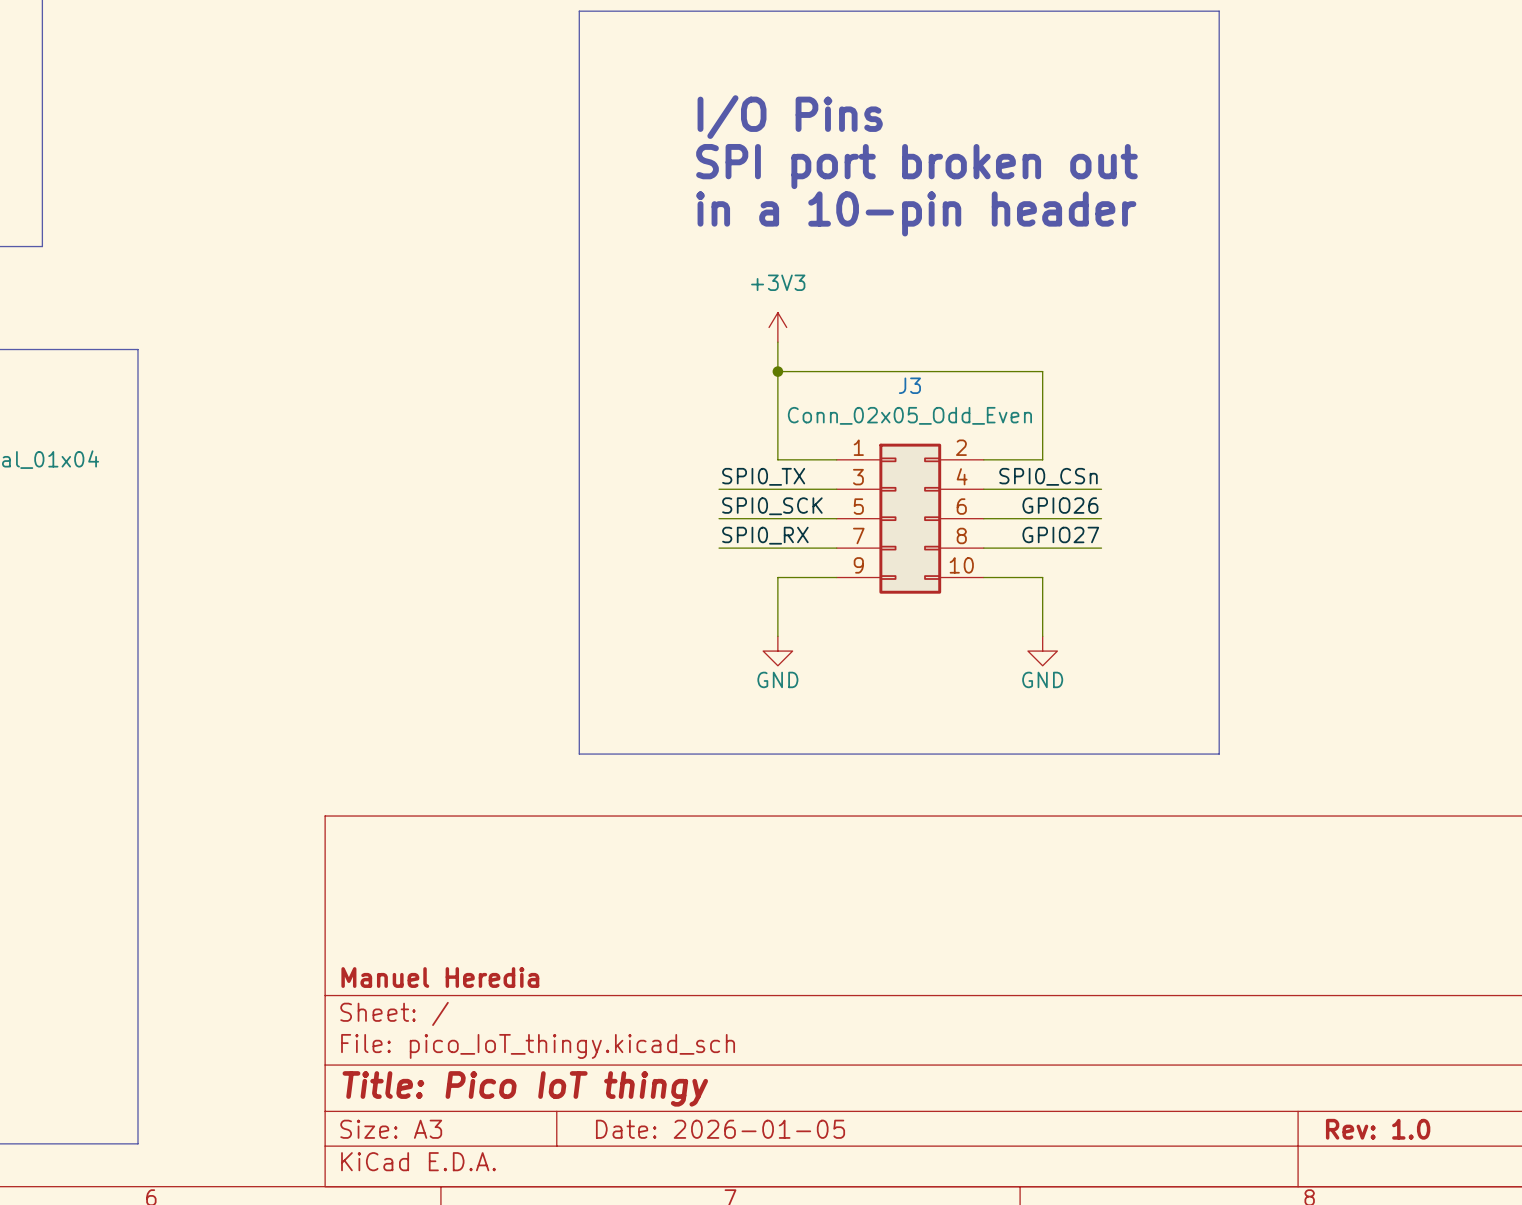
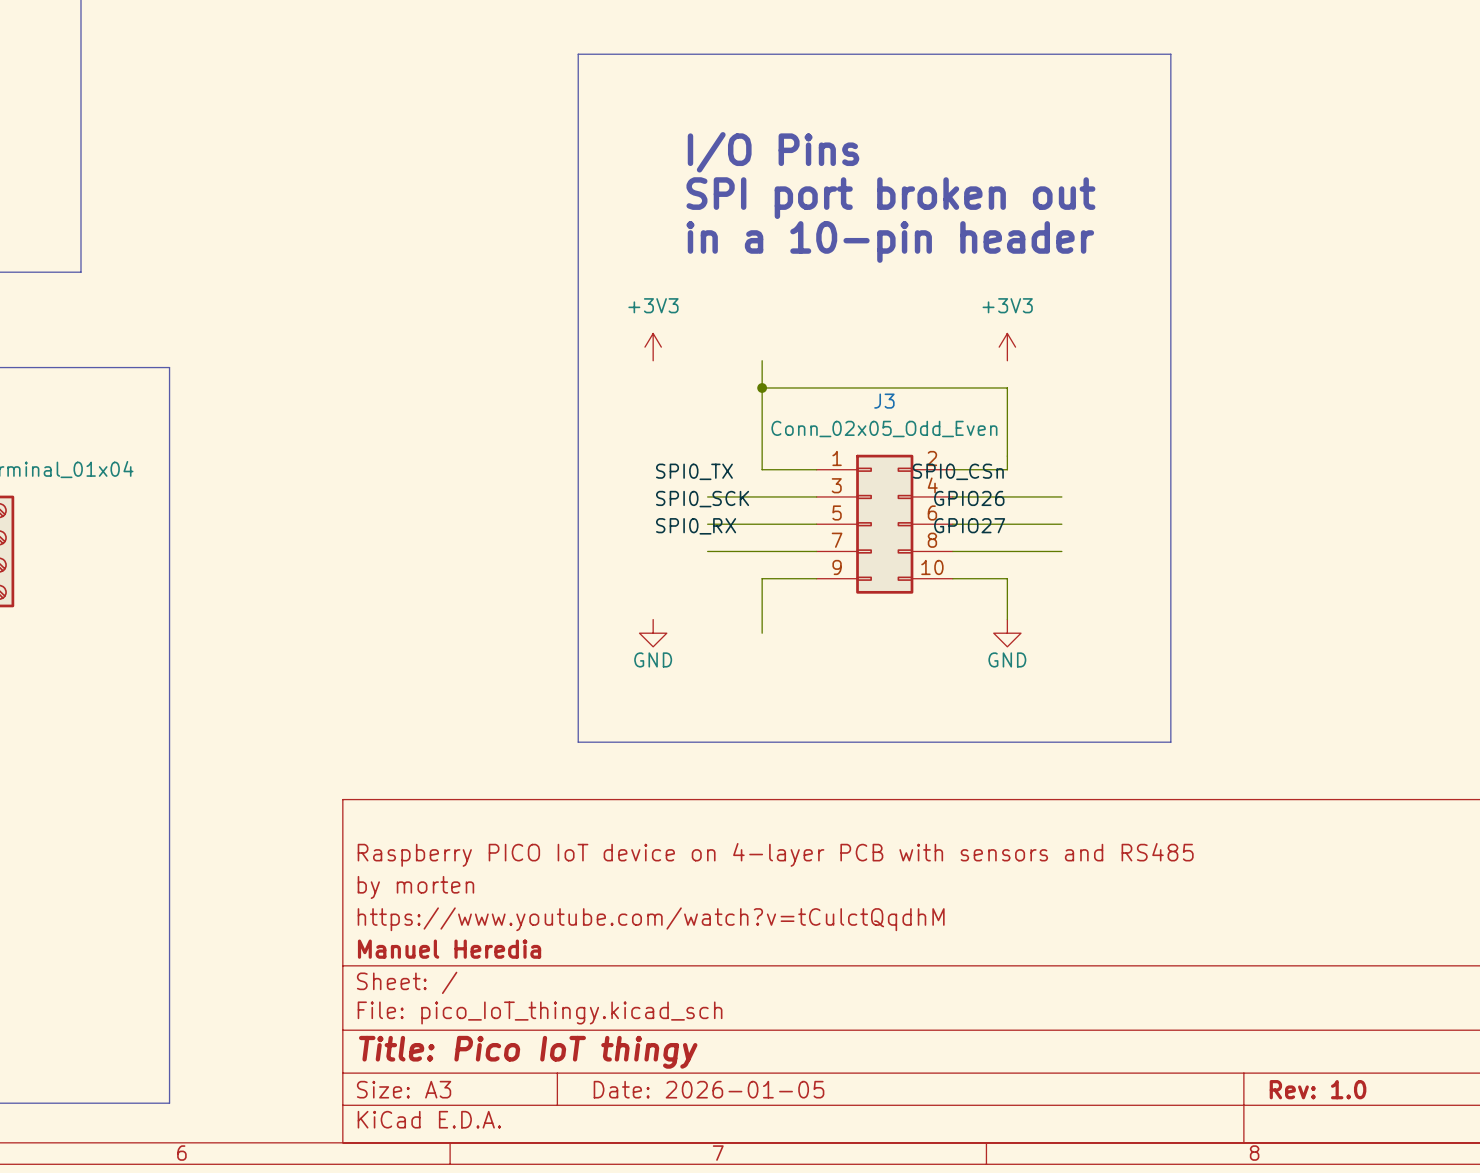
power symbol position: +3V3 (777, 327) -> +3V3 (653, 347)
power symbol: none -> +3V3 (1007, 347)
label position: SPI0_TX (763, 476) -> SPI0_TX (694, 471)
label position: SPI0_CSn (1048, 476) -> SPI0_CSn (958, 471)
label position: GPIO26 (1060, 505) -> GPIO26 (969, 498)
label position: SPI0_SCK (772, 506) -> SPI0_SCK (702, 499)
label position: GPIO27 (1060, 534) -> GPIO27 (969, 525)
label position: SPI0_RX (765, 535) -> SPI0_RX (696, 526)
power symbol position: GND (777, 651) -> GND (653, 633)
power symbol position: GND (1042, 651) -> GND (1007, 633)
title block: none -> Raspberry PICO IoT device on 4-layer PCB with sensors and RS485 (775, 854)
title block: none -> by morten (415, 887)
title block: none -> https://www.youtube.com/watch?v=tCulctQqdhM (651, 919)

